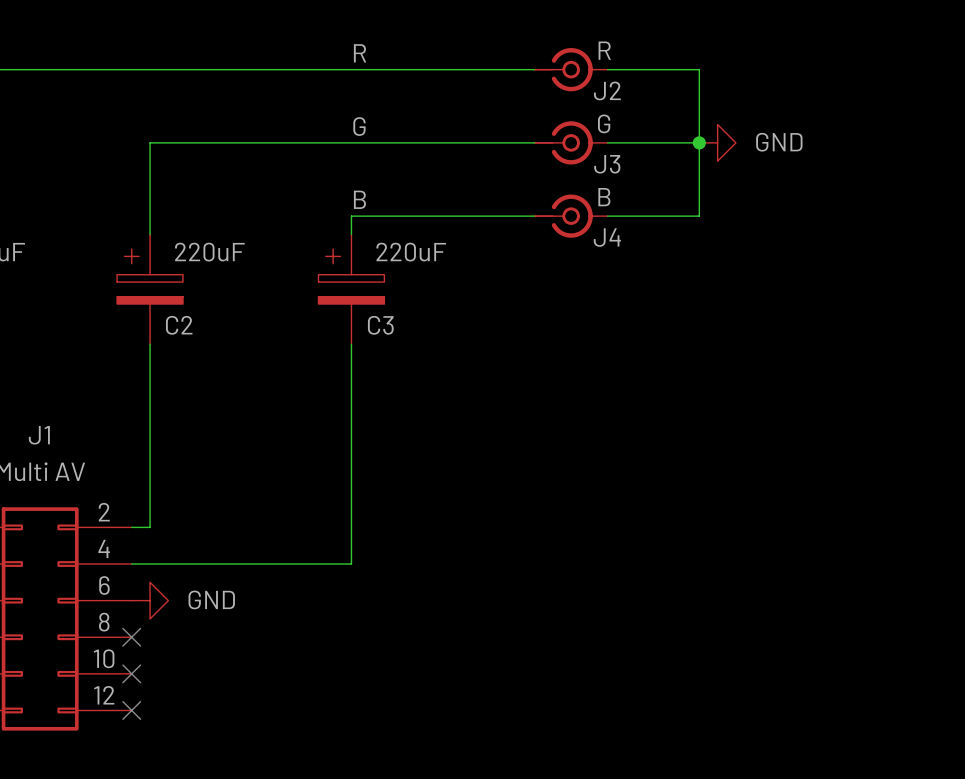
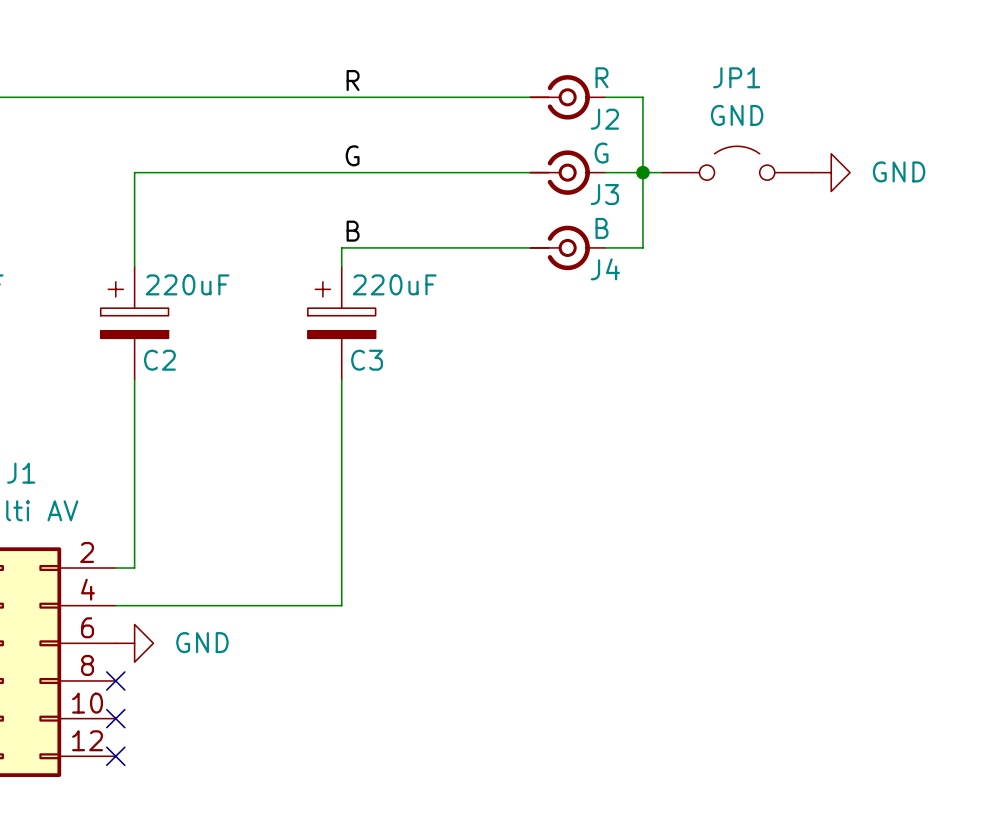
wire: (644, 69) (699, 69) (699, 216) (644, 216) -> (642, 97) (642, 247)
JP1: none -> GND (737, 163)
junction position: (699, 142) -> (642, 172)
power symbol position: GND (717, 142) -> GND (831, 172)

